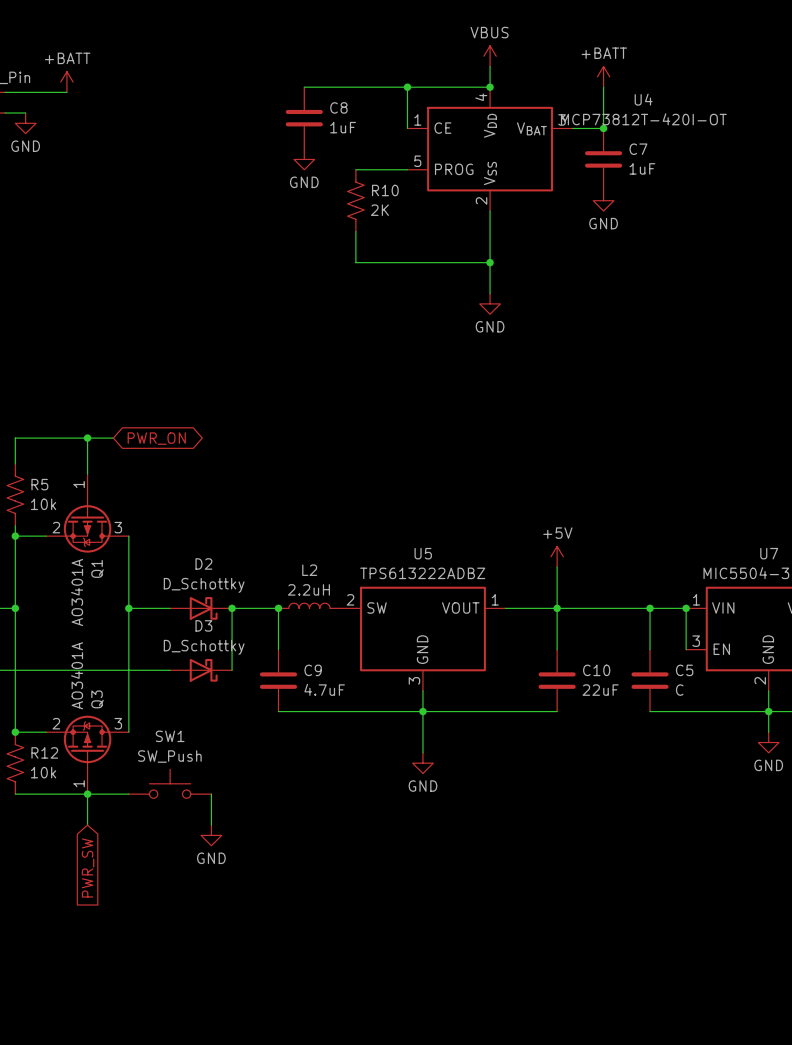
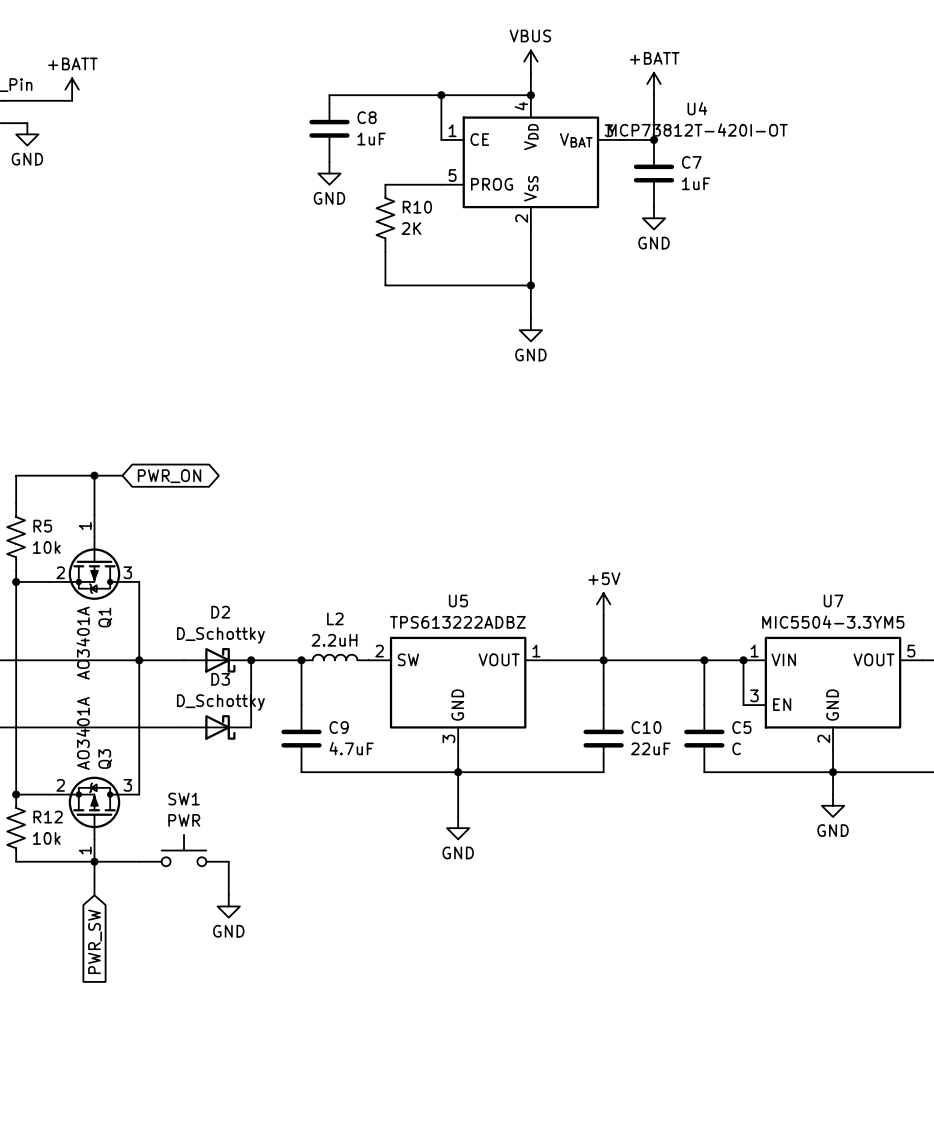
wire: none -> (16, 660) (139, 660)
junction: (15, 608) -> none
SW1 value: SW_Push (169, 756) -> PWR (184, 820)

